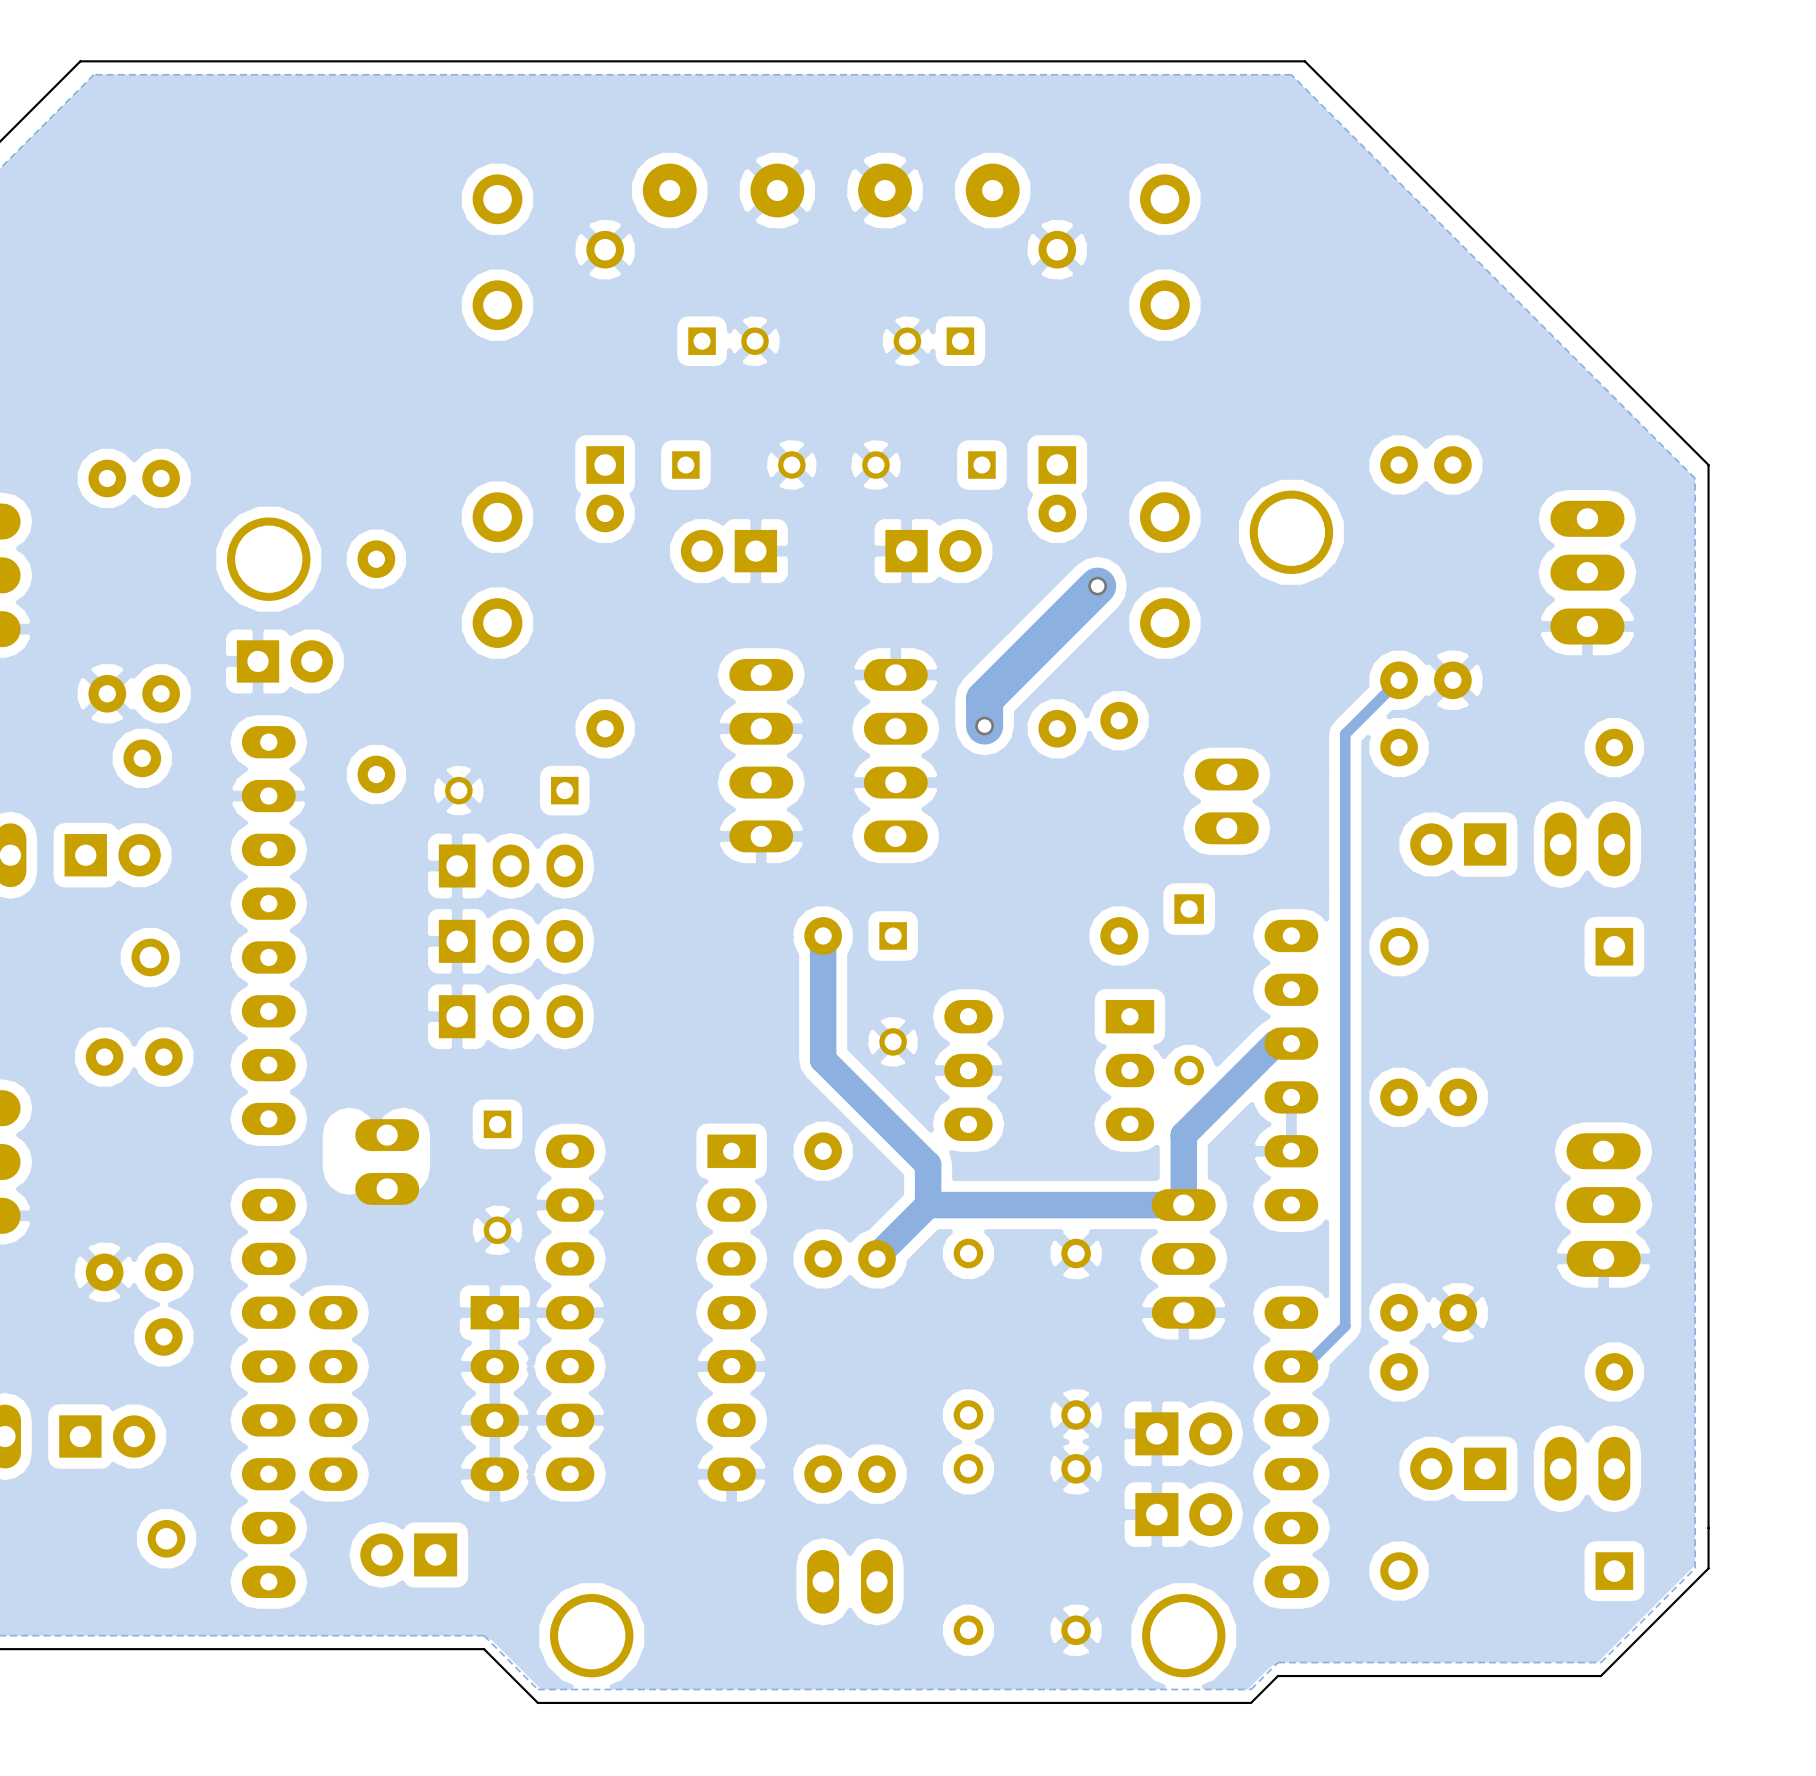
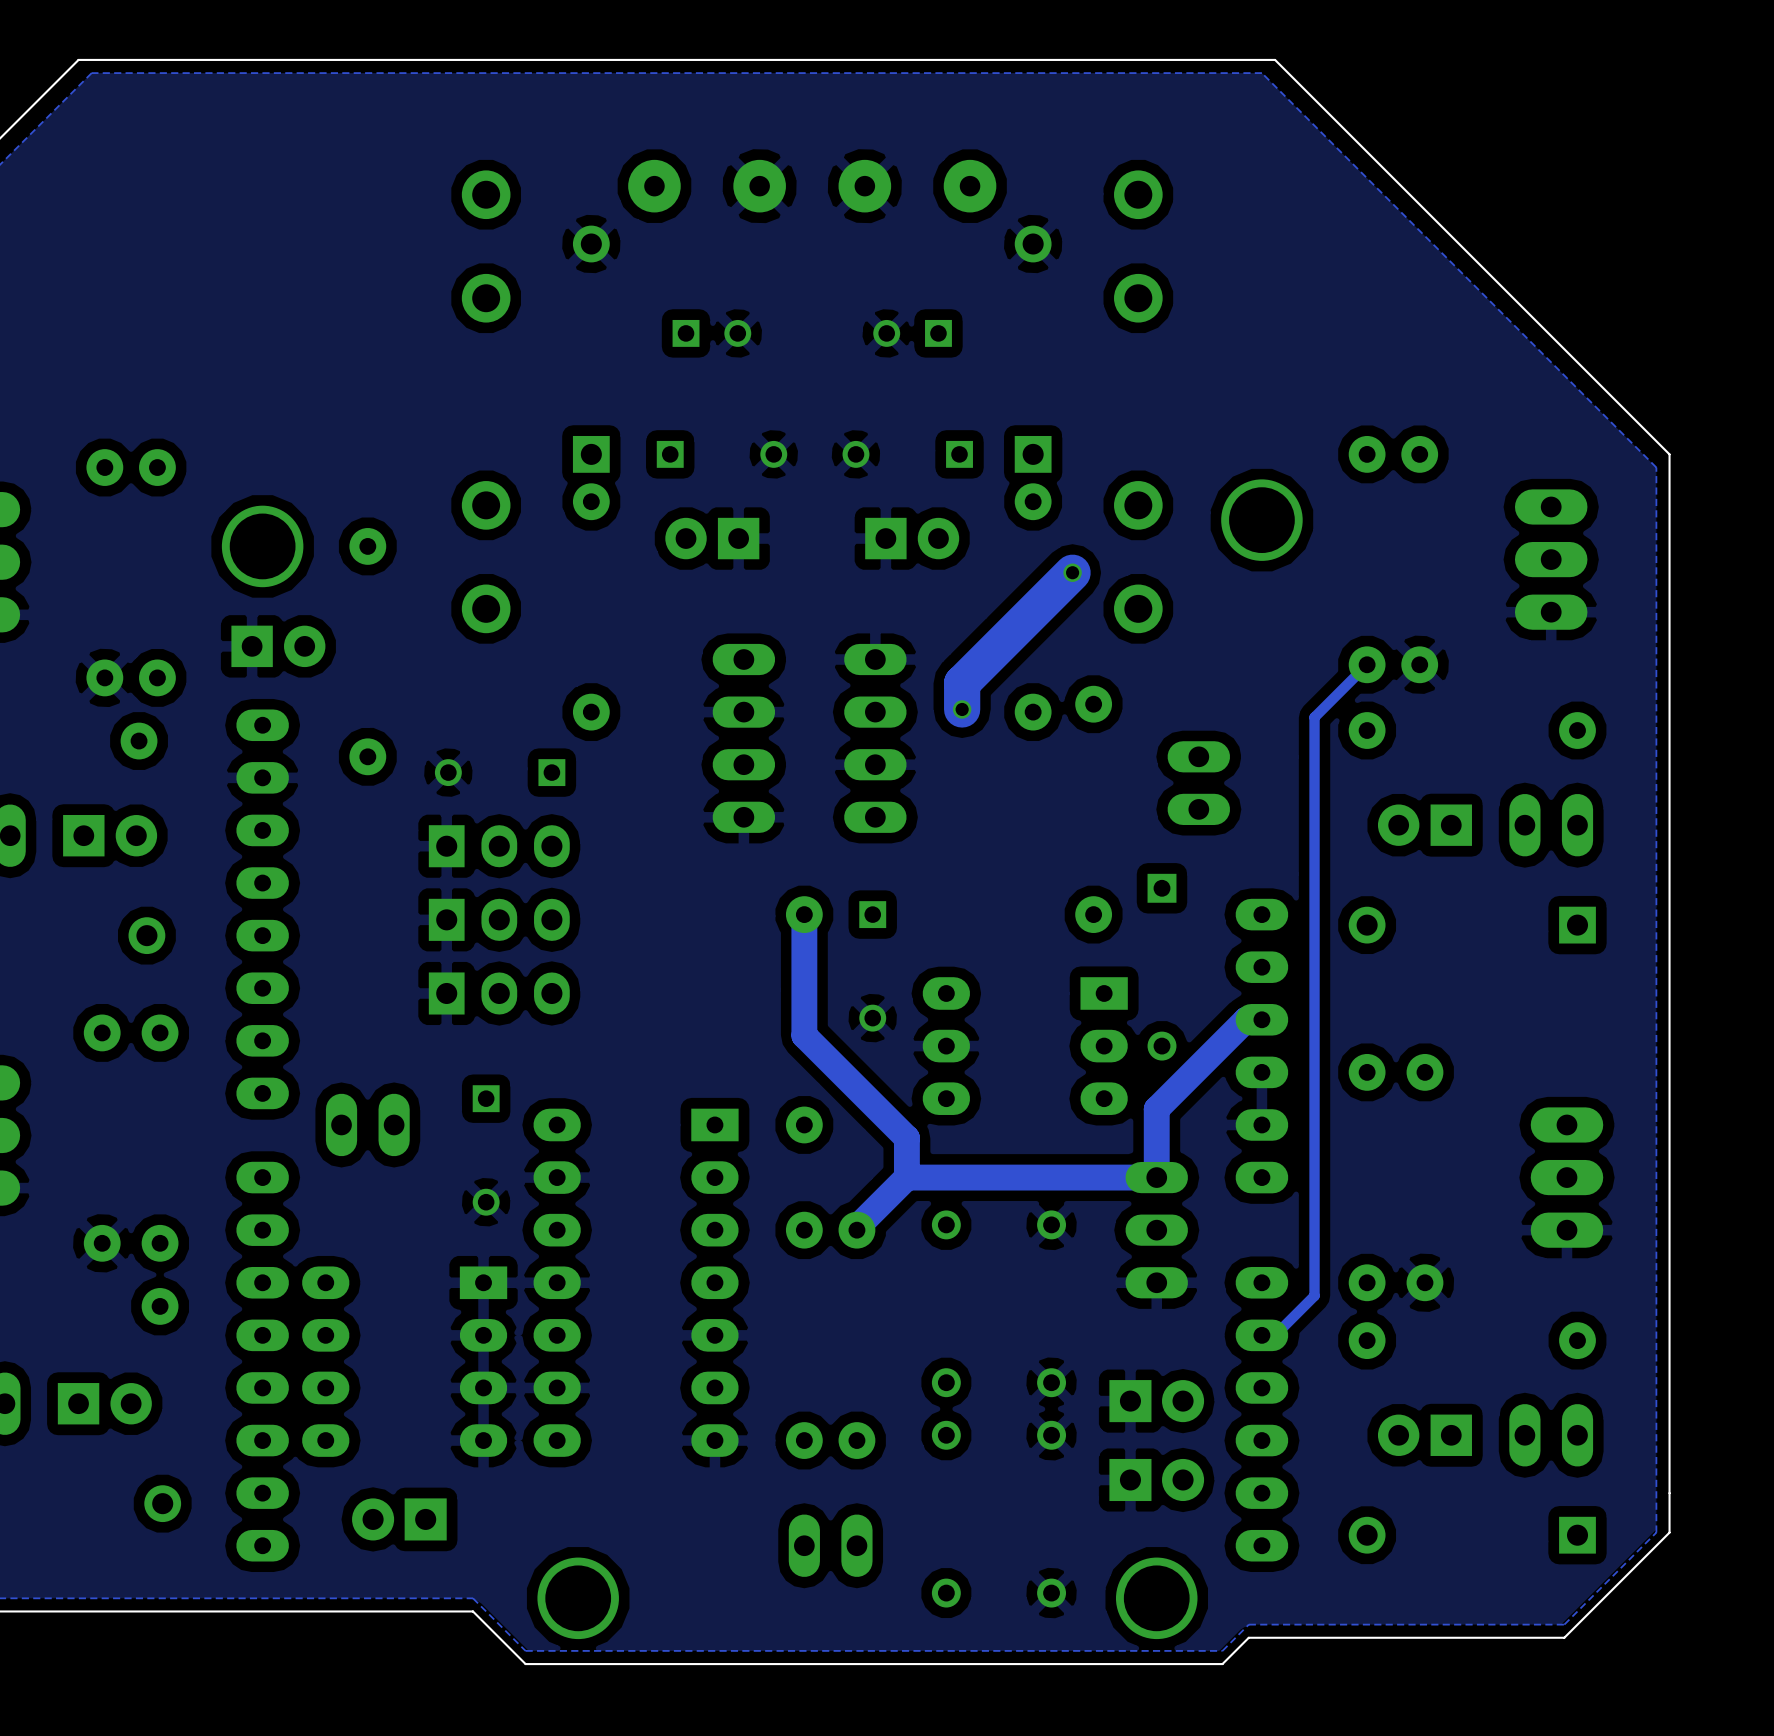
part rotation: 0° (387, 1162) -> 90° clockwise (367, 1124)

